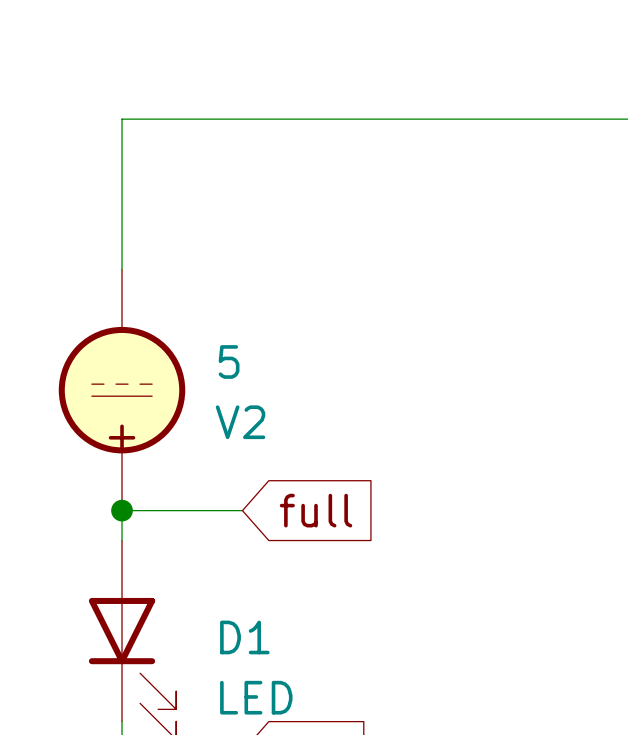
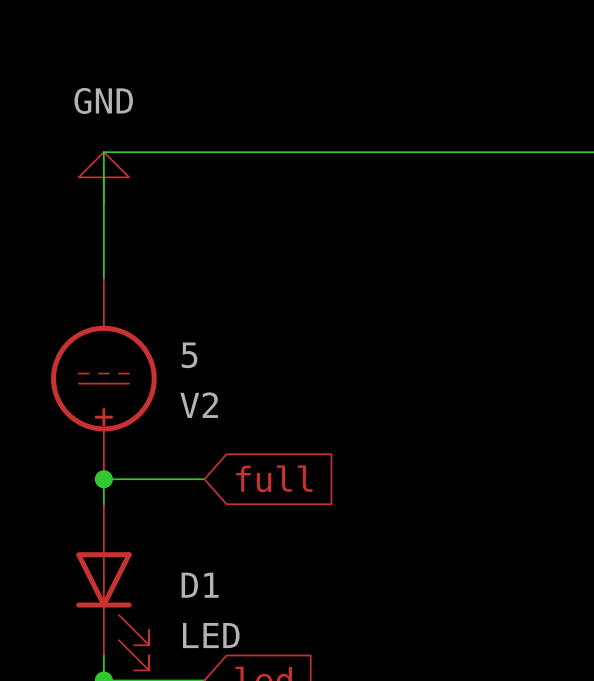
power symbol: none -> GND (103, 177)

